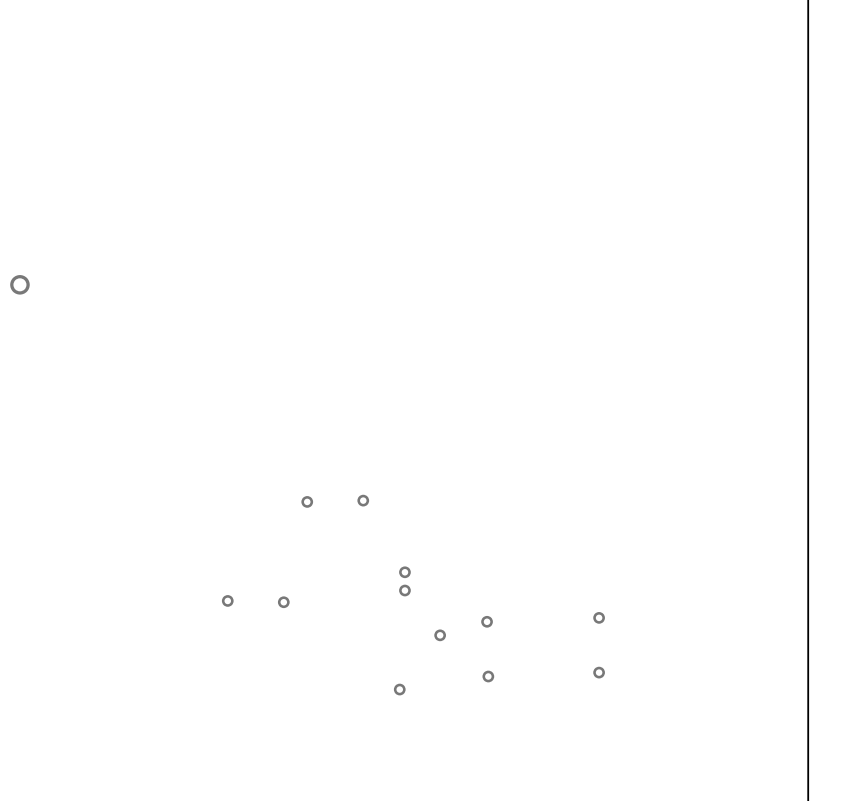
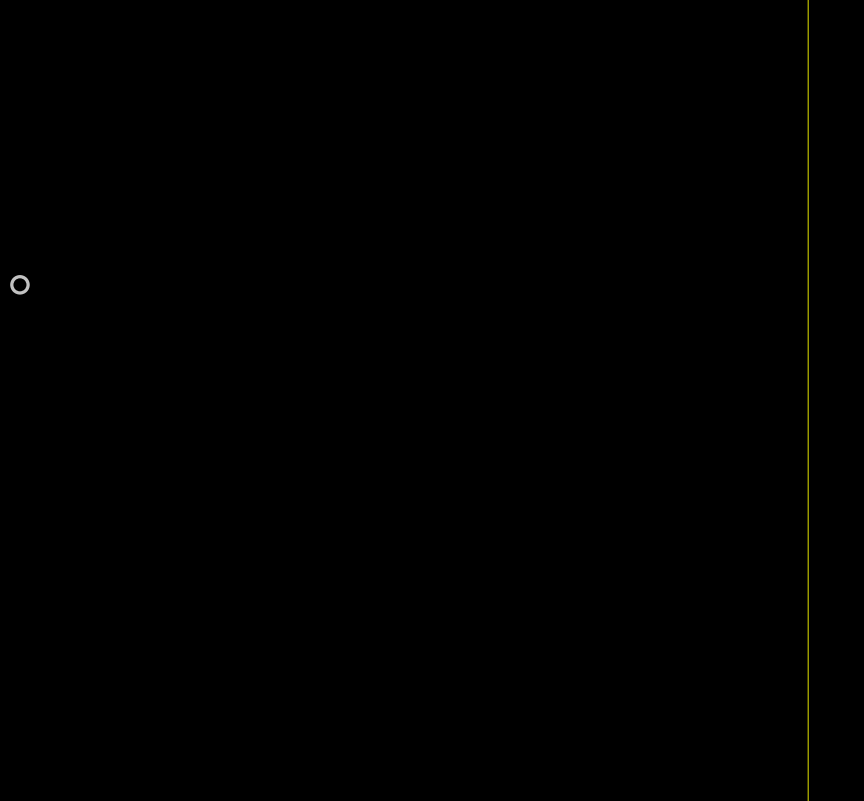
via: (363, 500) -> none
via: (307, 501) -> none
via: (404, 572) -> none
via: (404, 590) -> none
via: (227, 600) -> none
via: (283, 602) -> none
via: (599, 617) -> none
via: (487, 621) -> none
via: (440, 635) -> none
via: (599, 672) -> none
via: (488, 676) -> none
via: (399, 689) -> none

